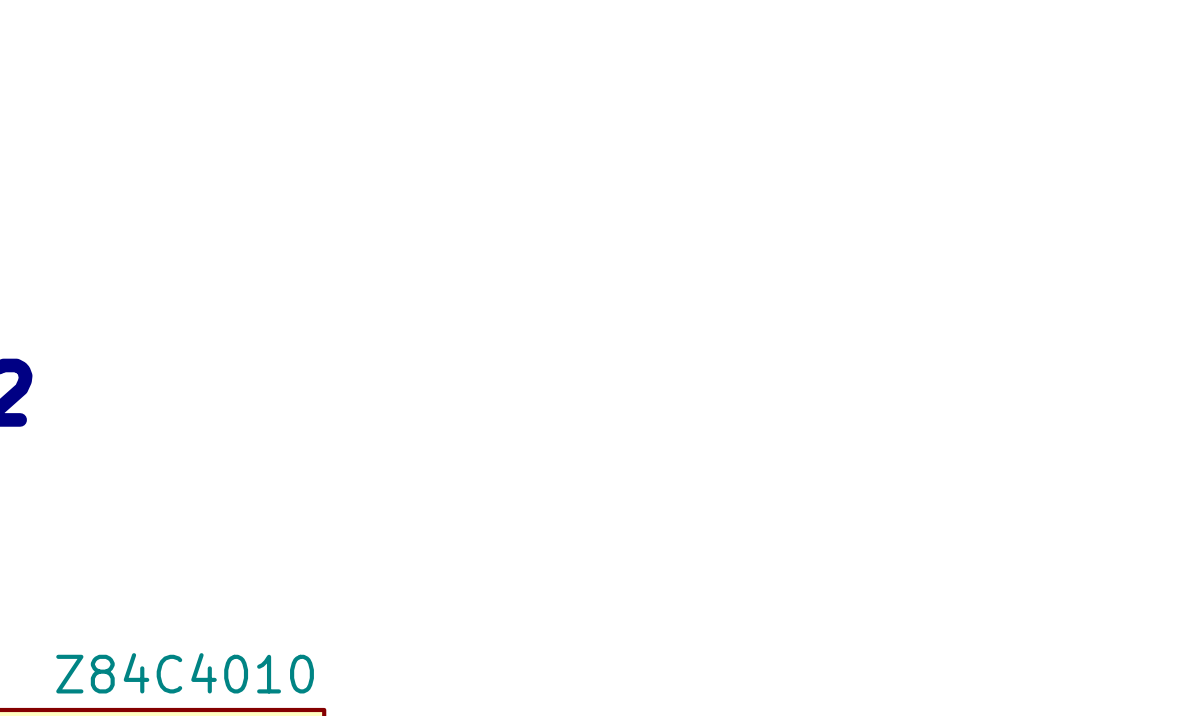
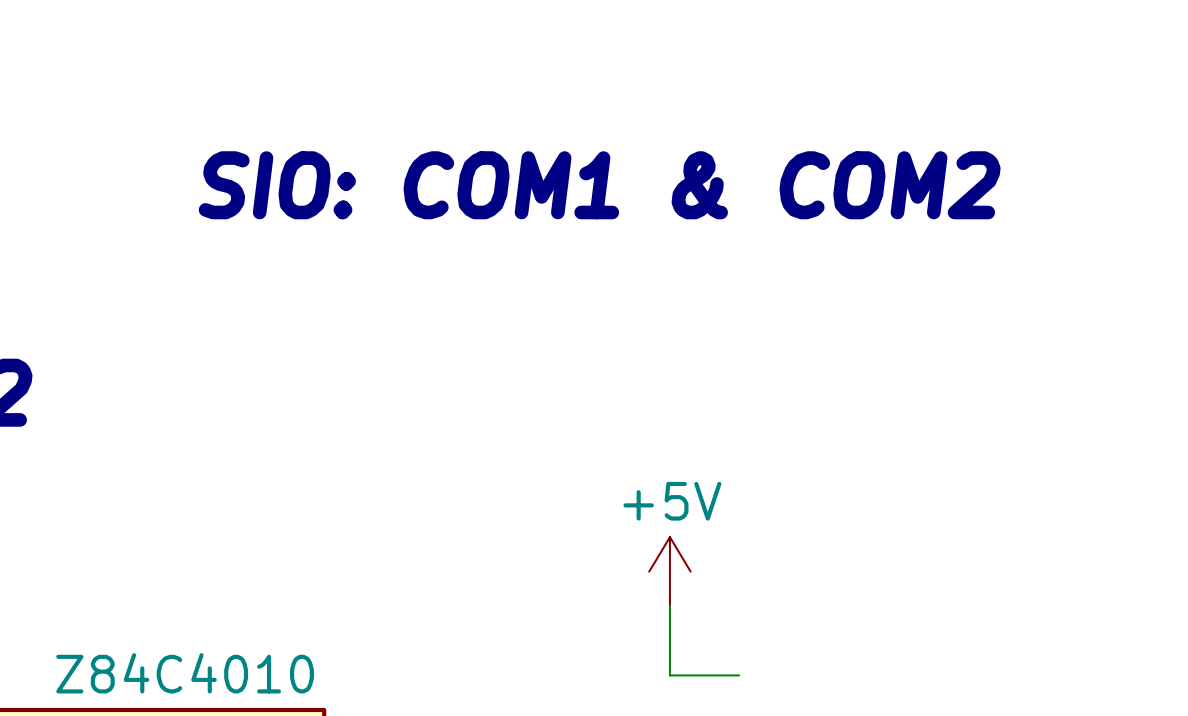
text: none -> SIO: COM1 & COM2 (599, 185)
power symbol: none -> +5V (669, 571)
wire: none -> (669, 606) (669, 675) (739, 675)

